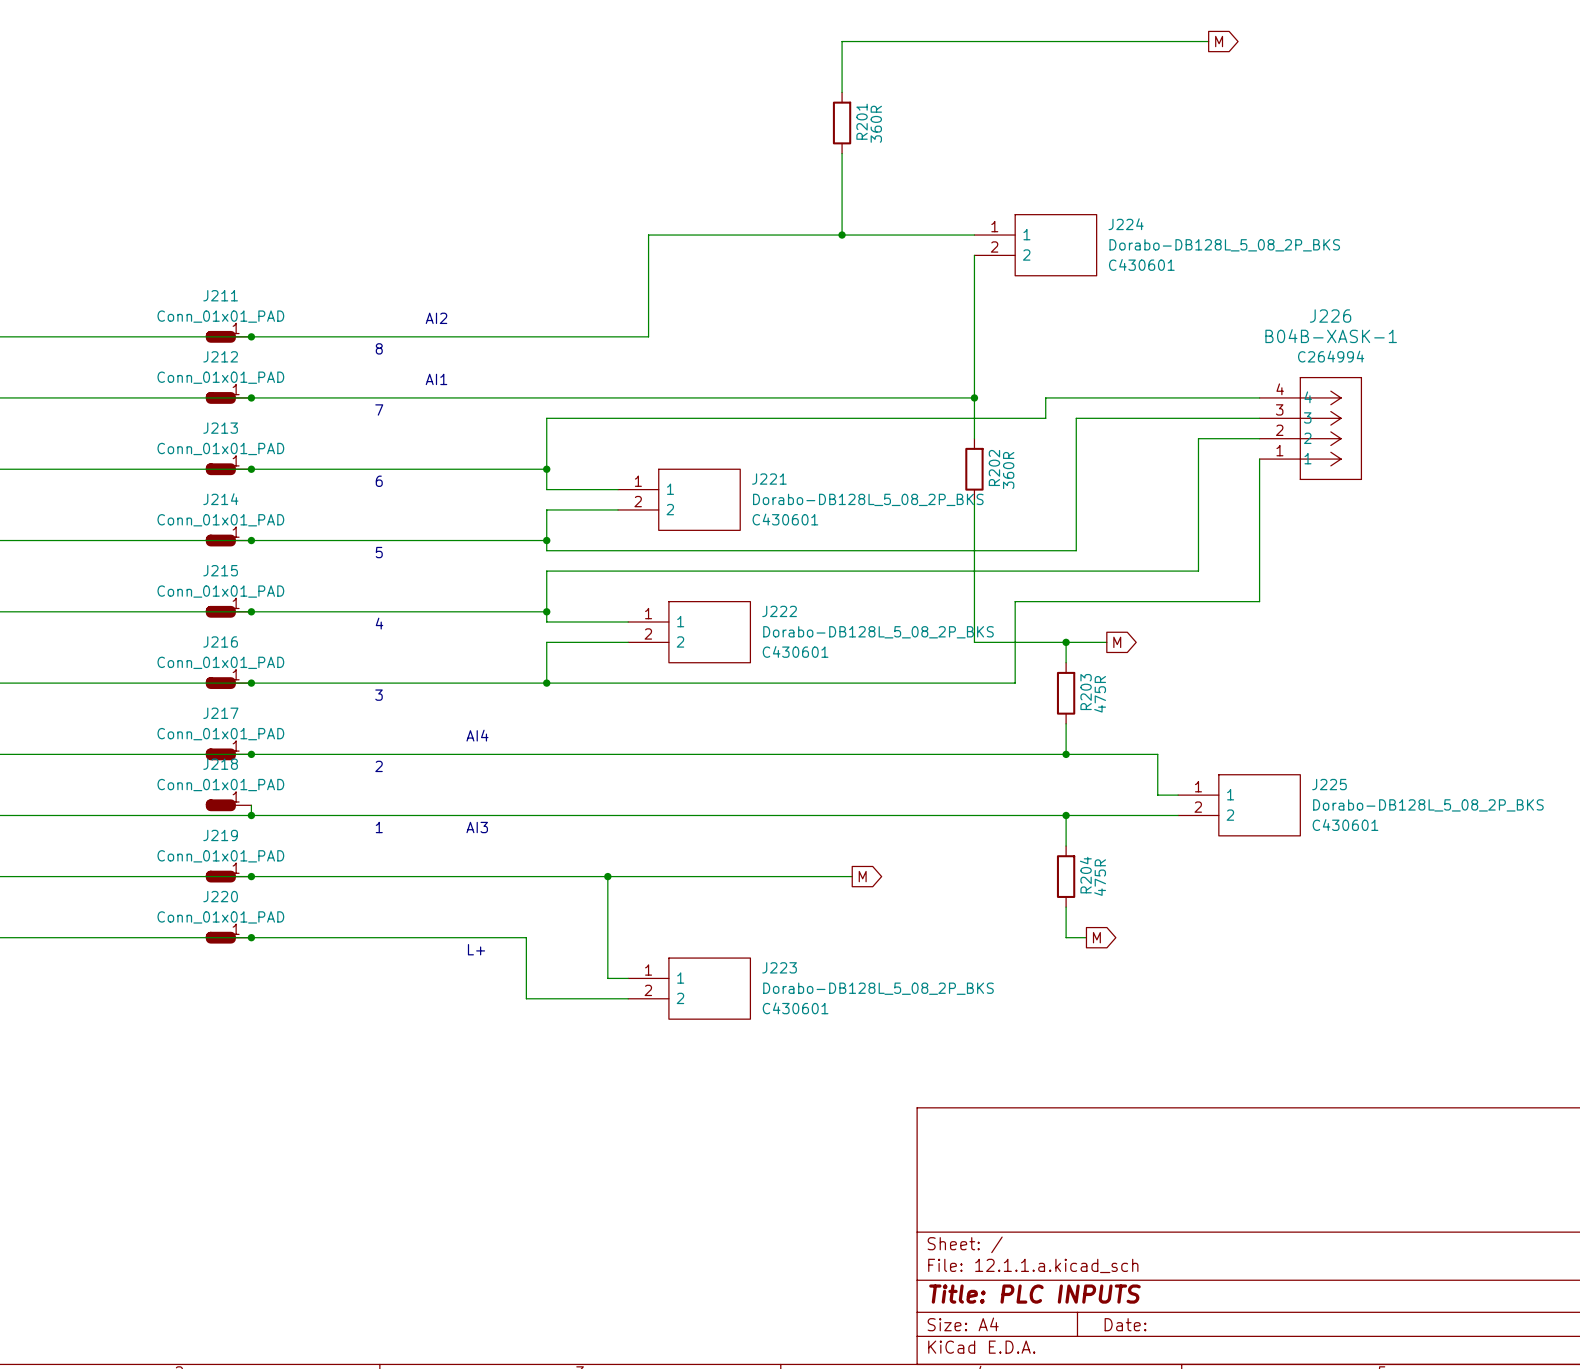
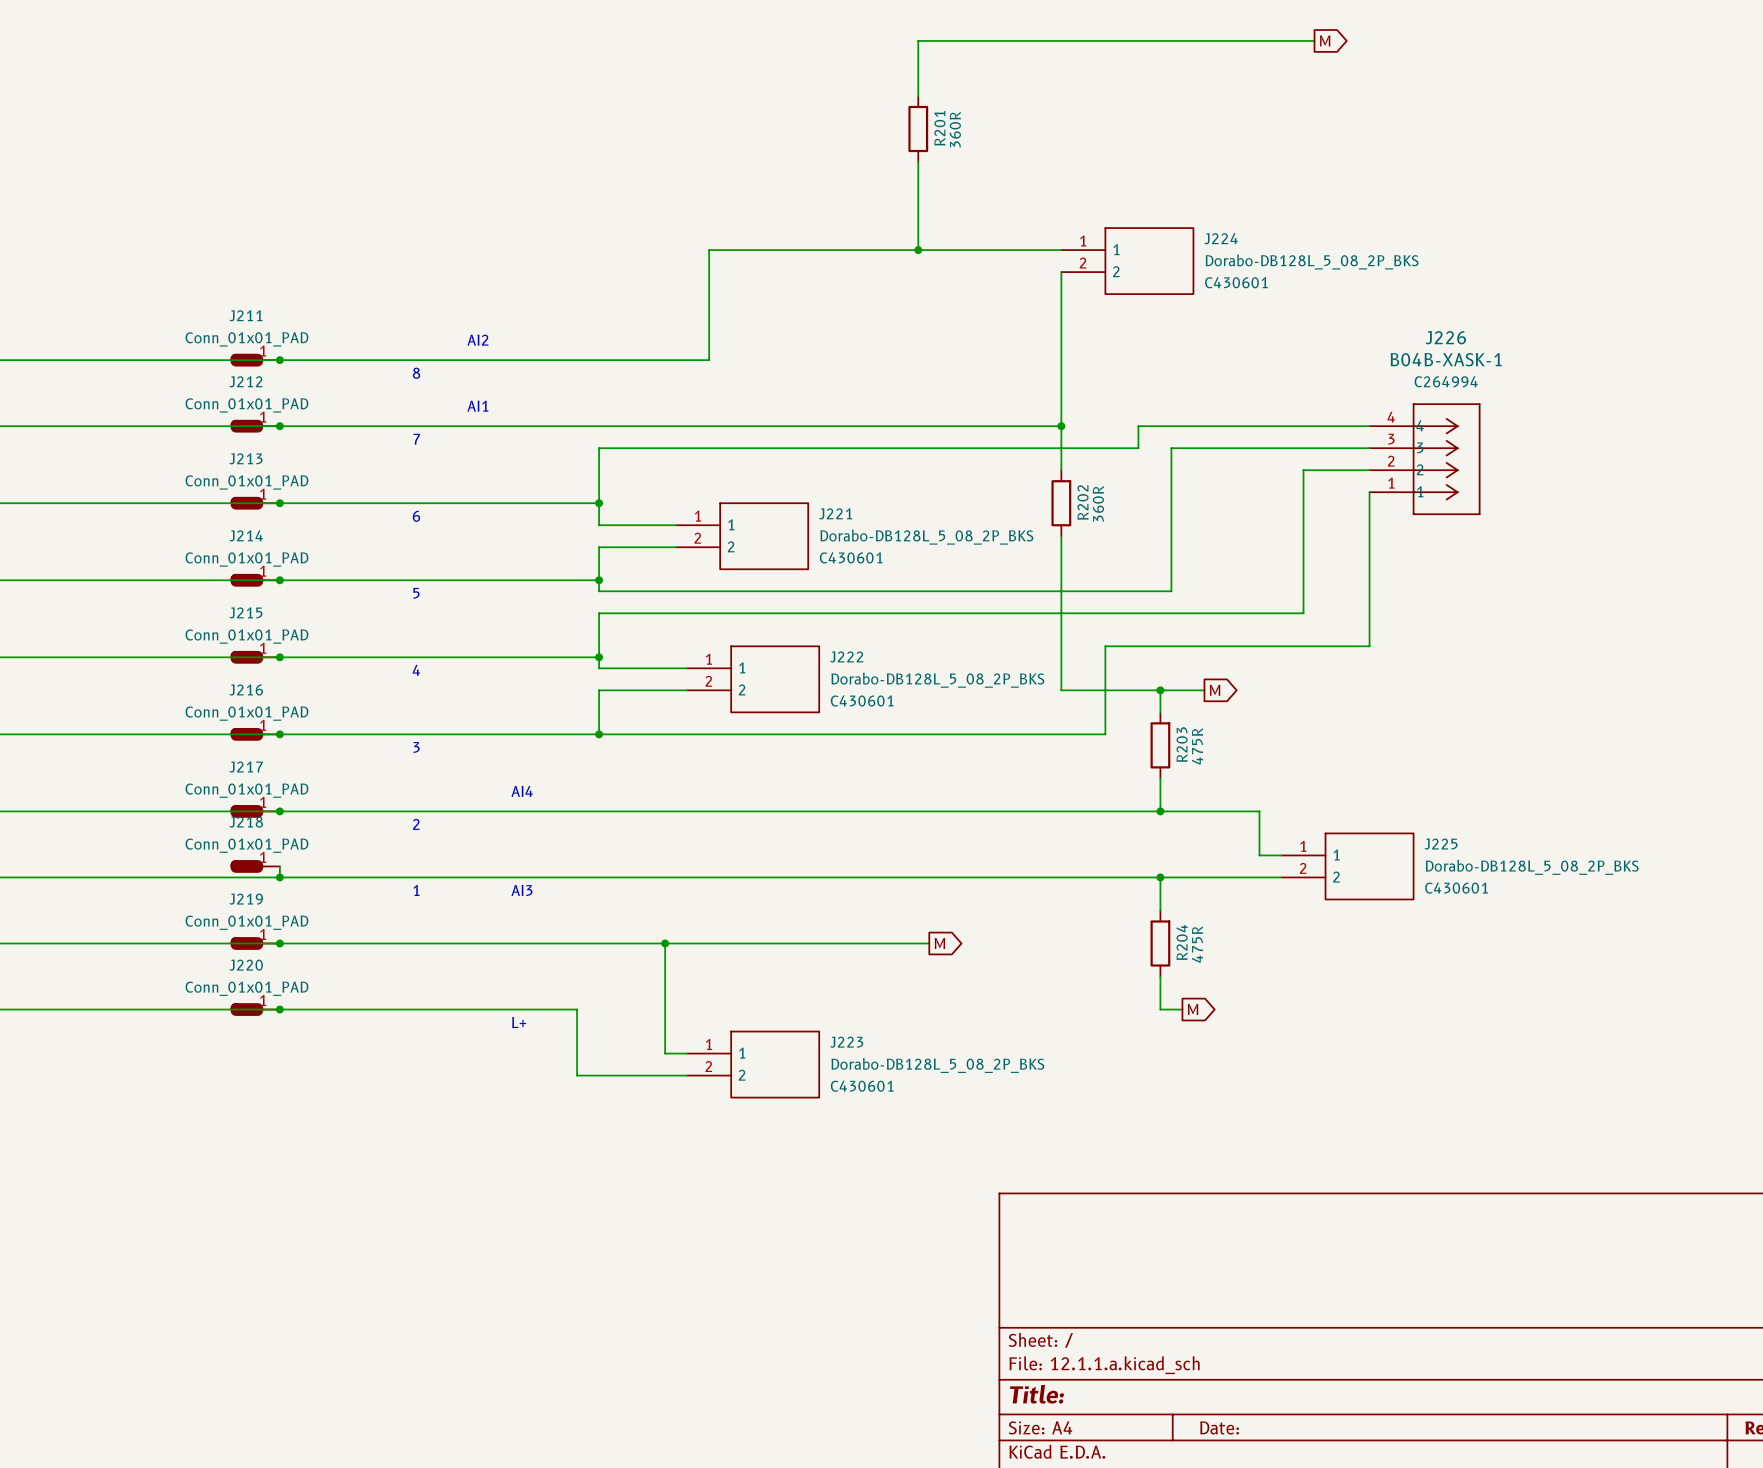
title block: Title: PLC INPUTS (1034, 1294) -> Title: (1037, 1394)

